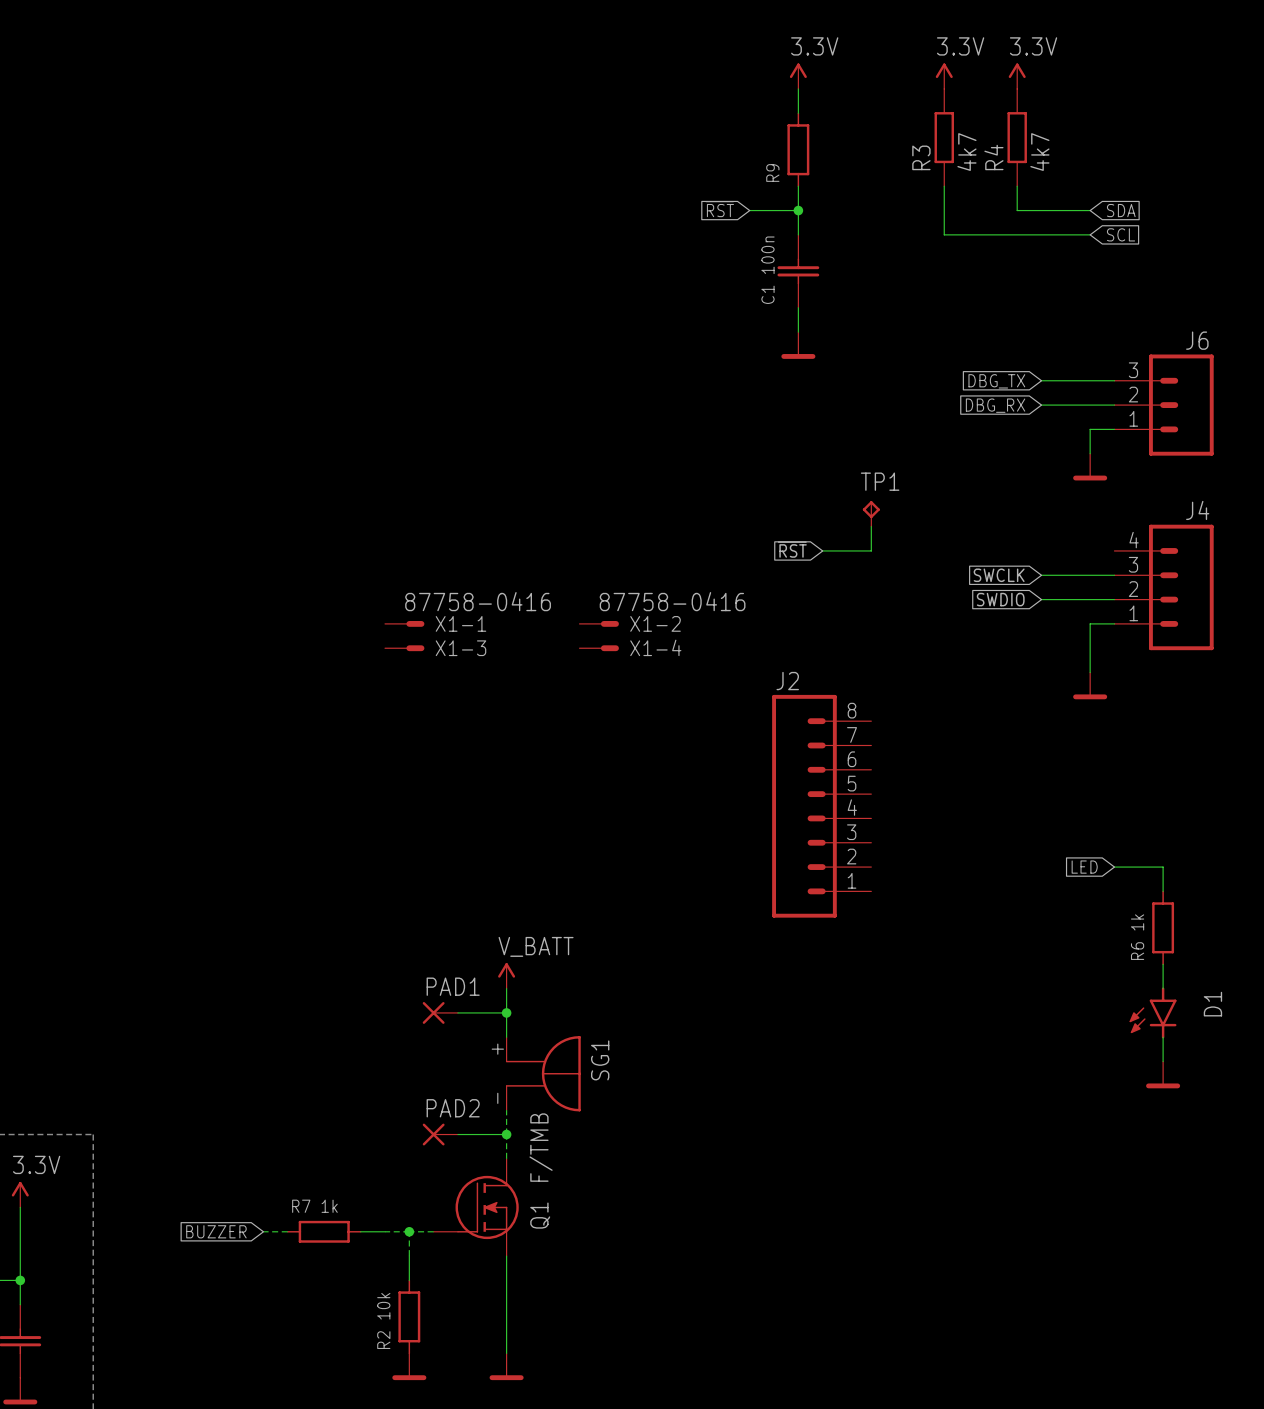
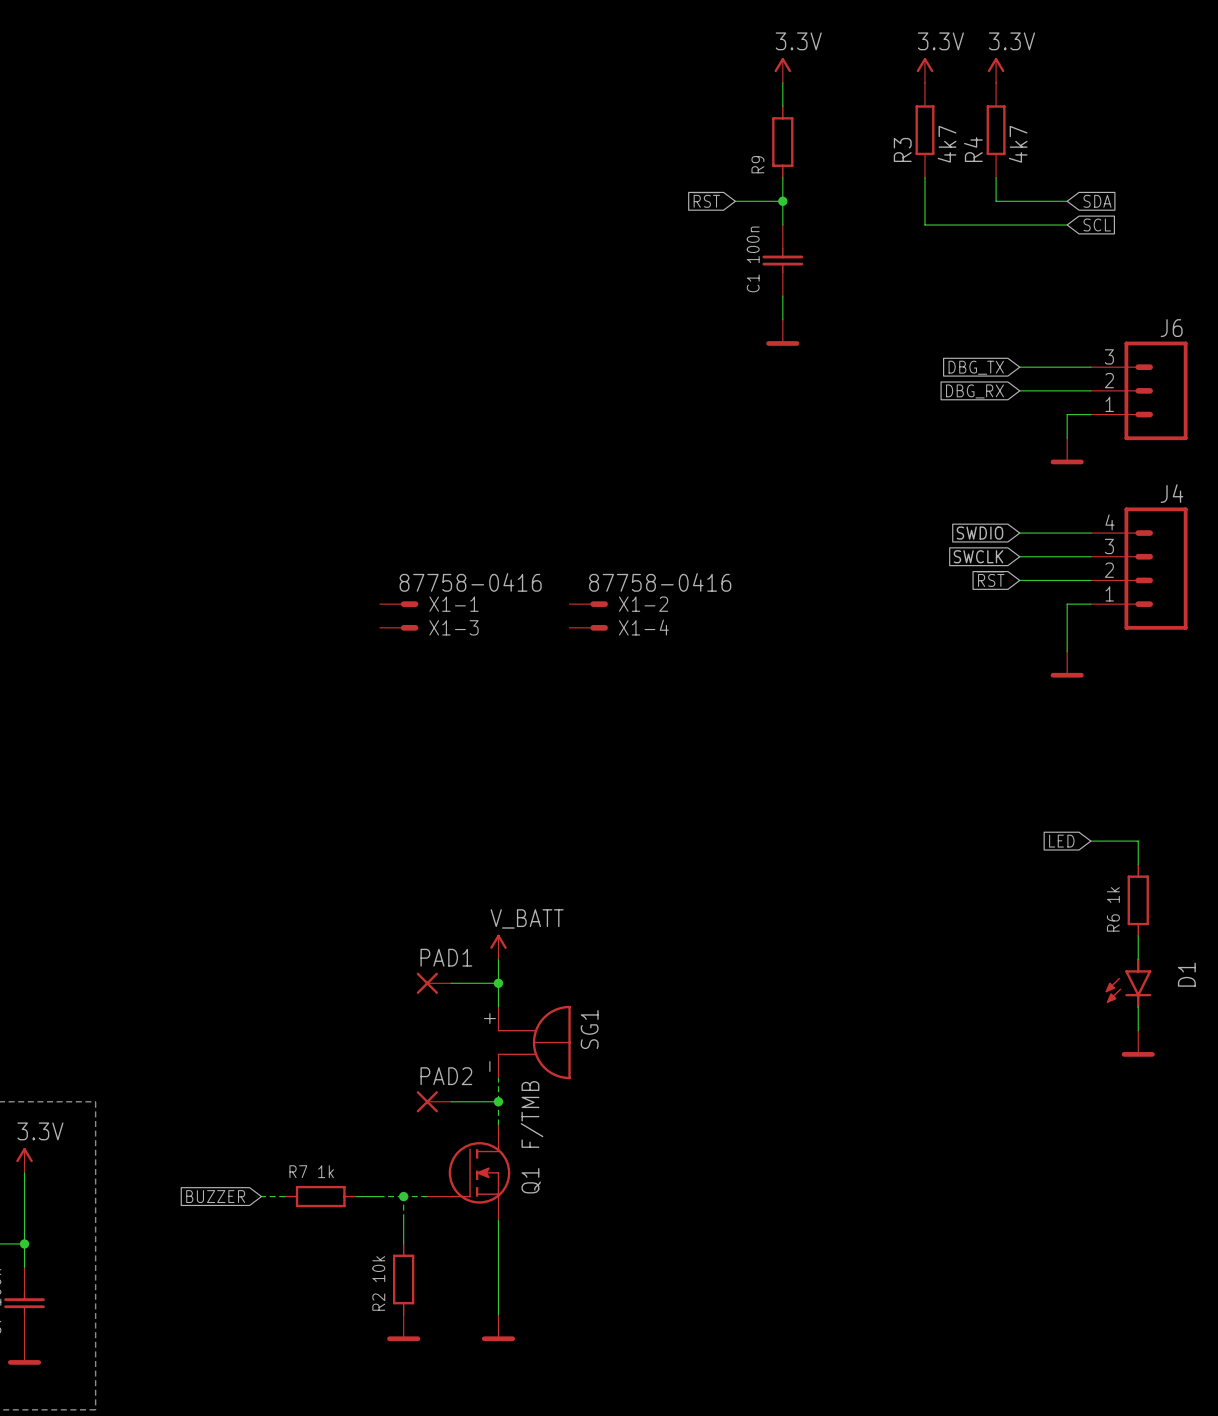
TP1: (871, 513) -> none
wire: (871, 526) (871, 550) (822, 550) -> none
global label: ~{RST} (792, 549) -> none
global label: none -> SWDIO (980, 533)
wire: none -> (1019, 533) (1090, 533)
global label: SWDIO (1000, 599) -> ~{RST} (990, 579)
J2: (821, 806) -> none

